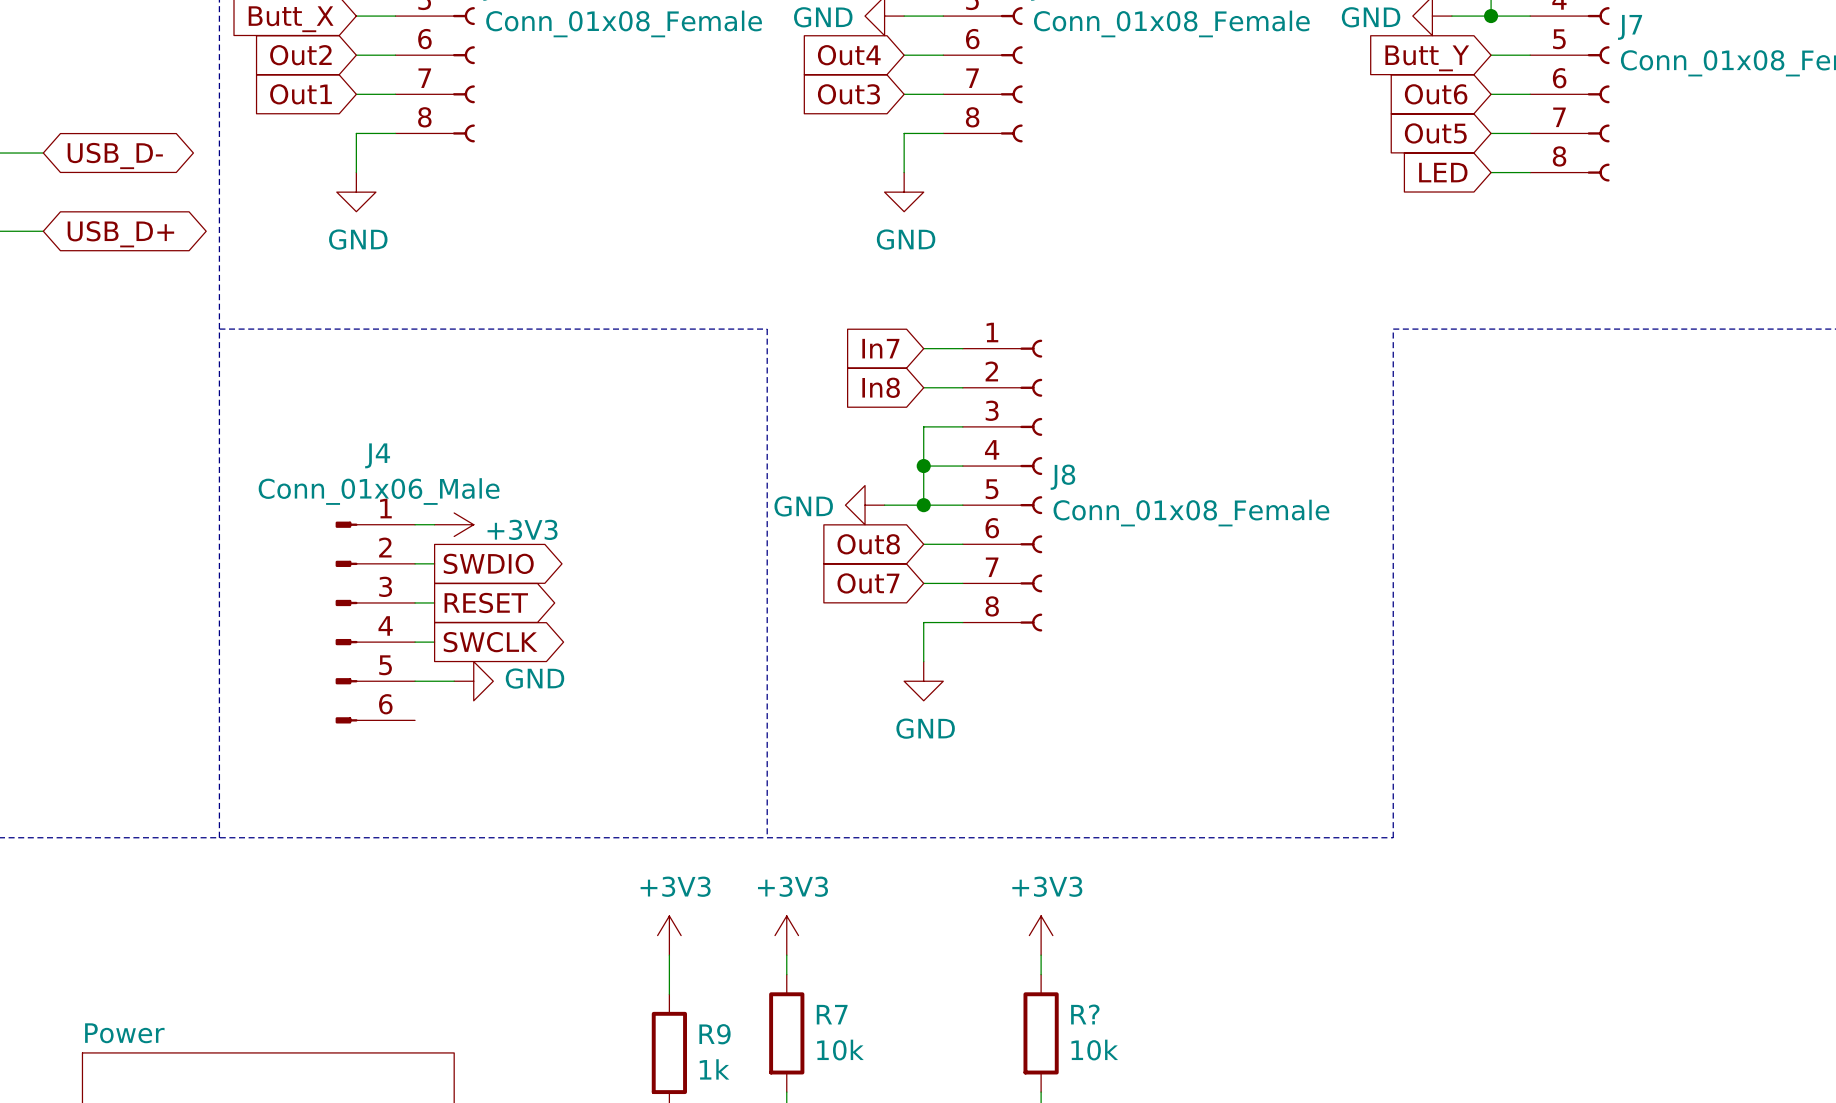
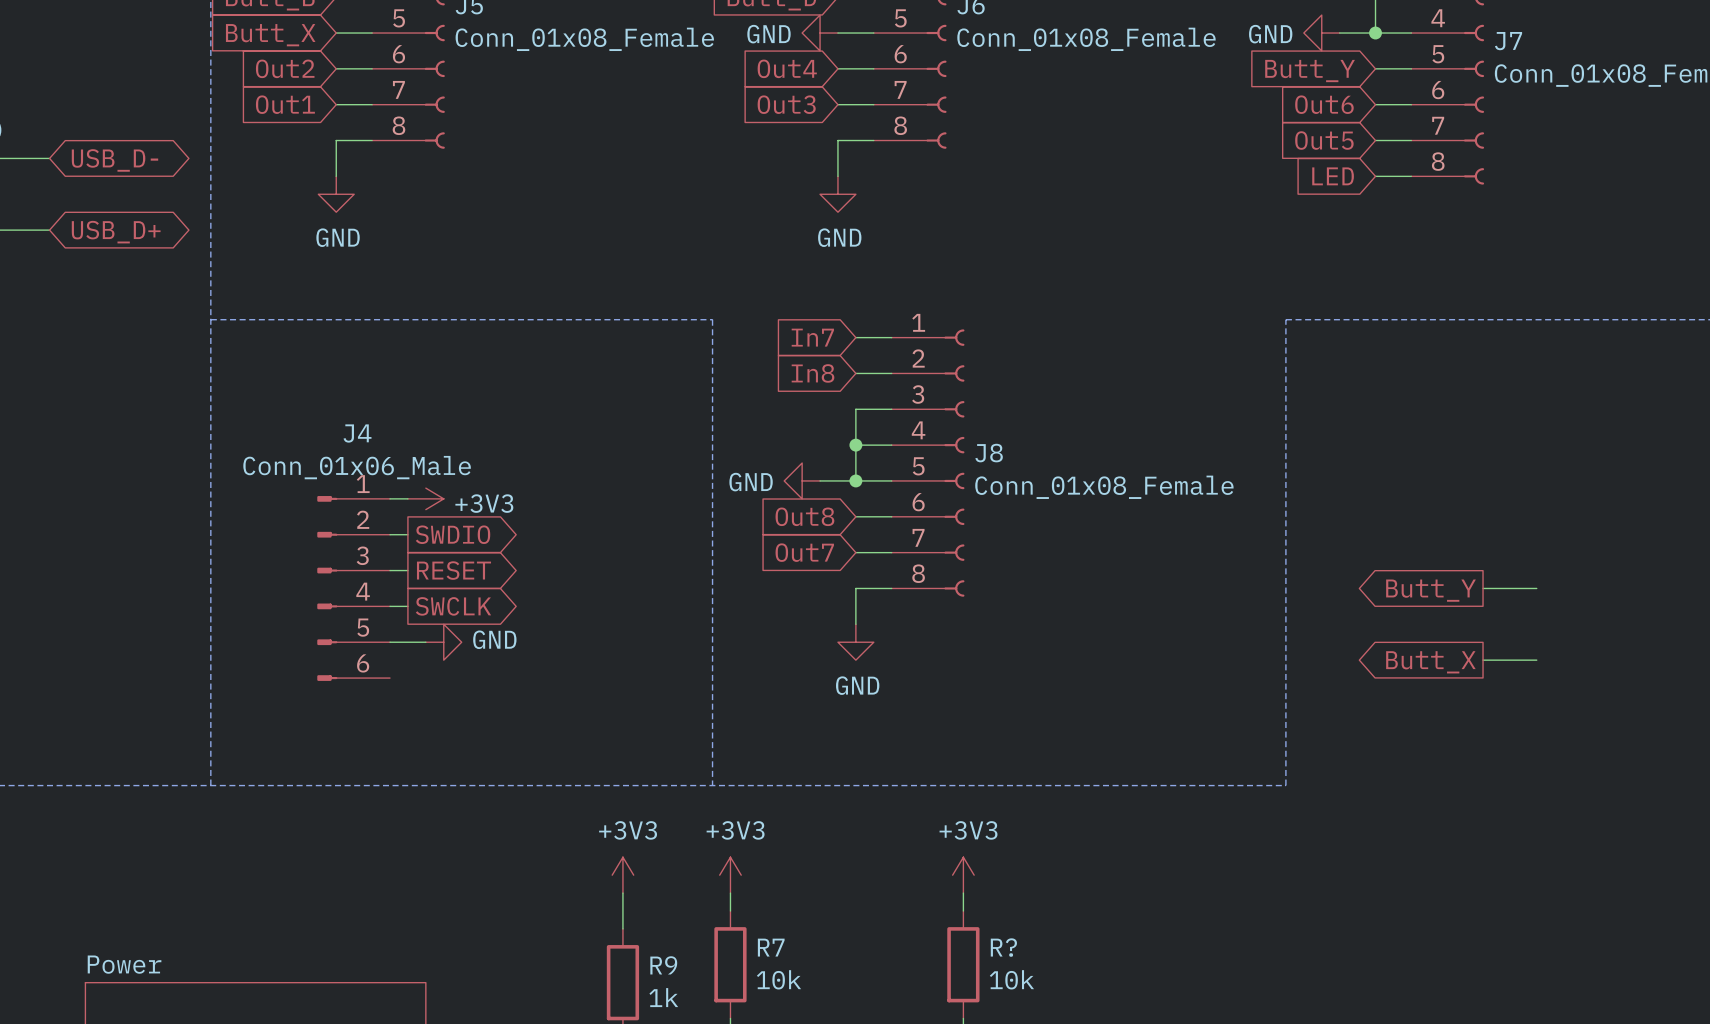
wire: none -> (1483, 588) (1536, 588)
global label: none -> Butt_Y (1431, 590)
wire: none -> (1483, 660) (1536, 660)
global label: none -> Butt_X (1430, 662)

